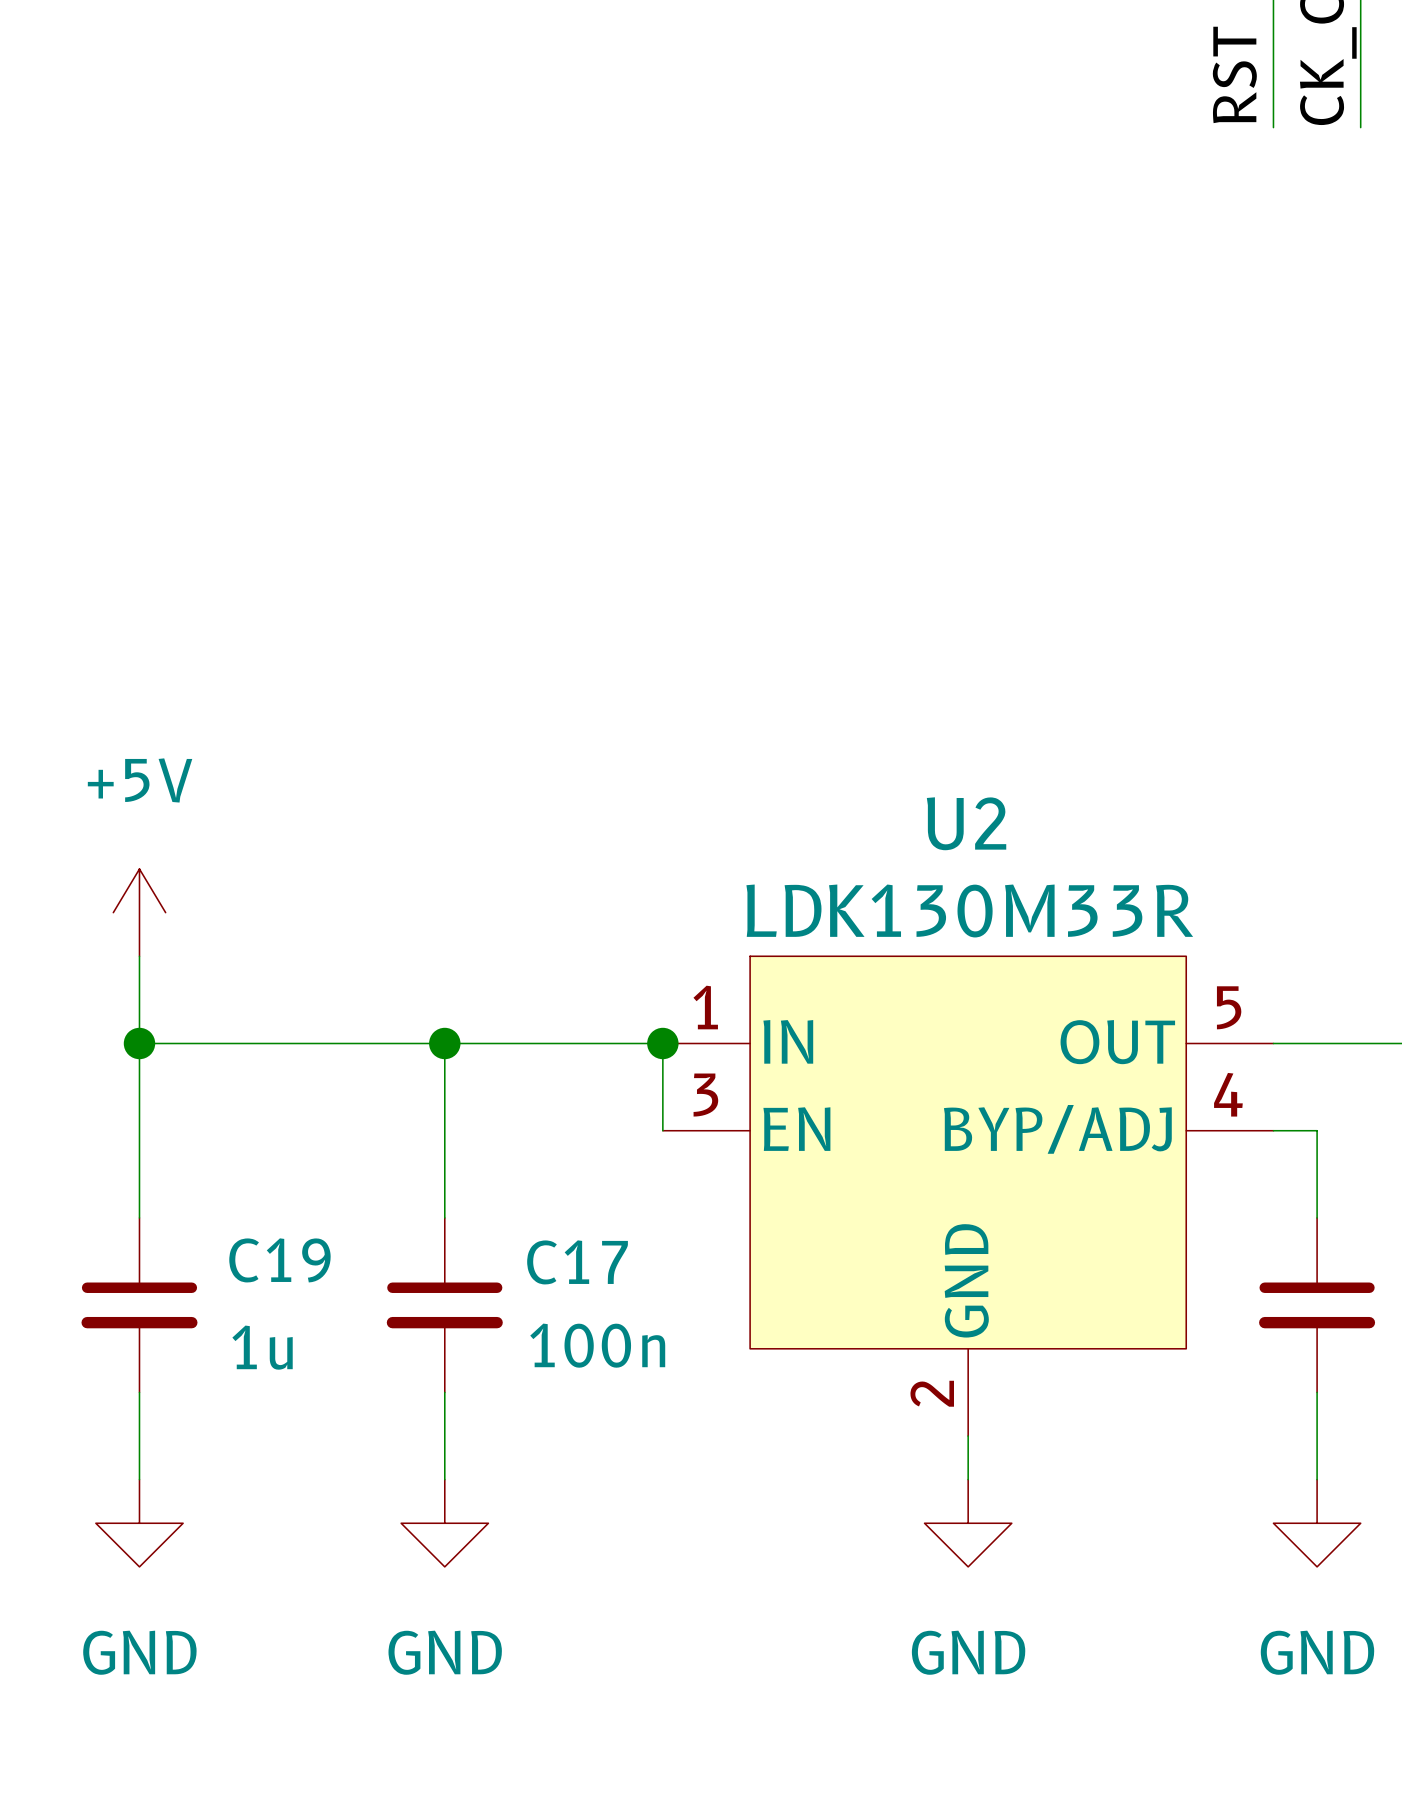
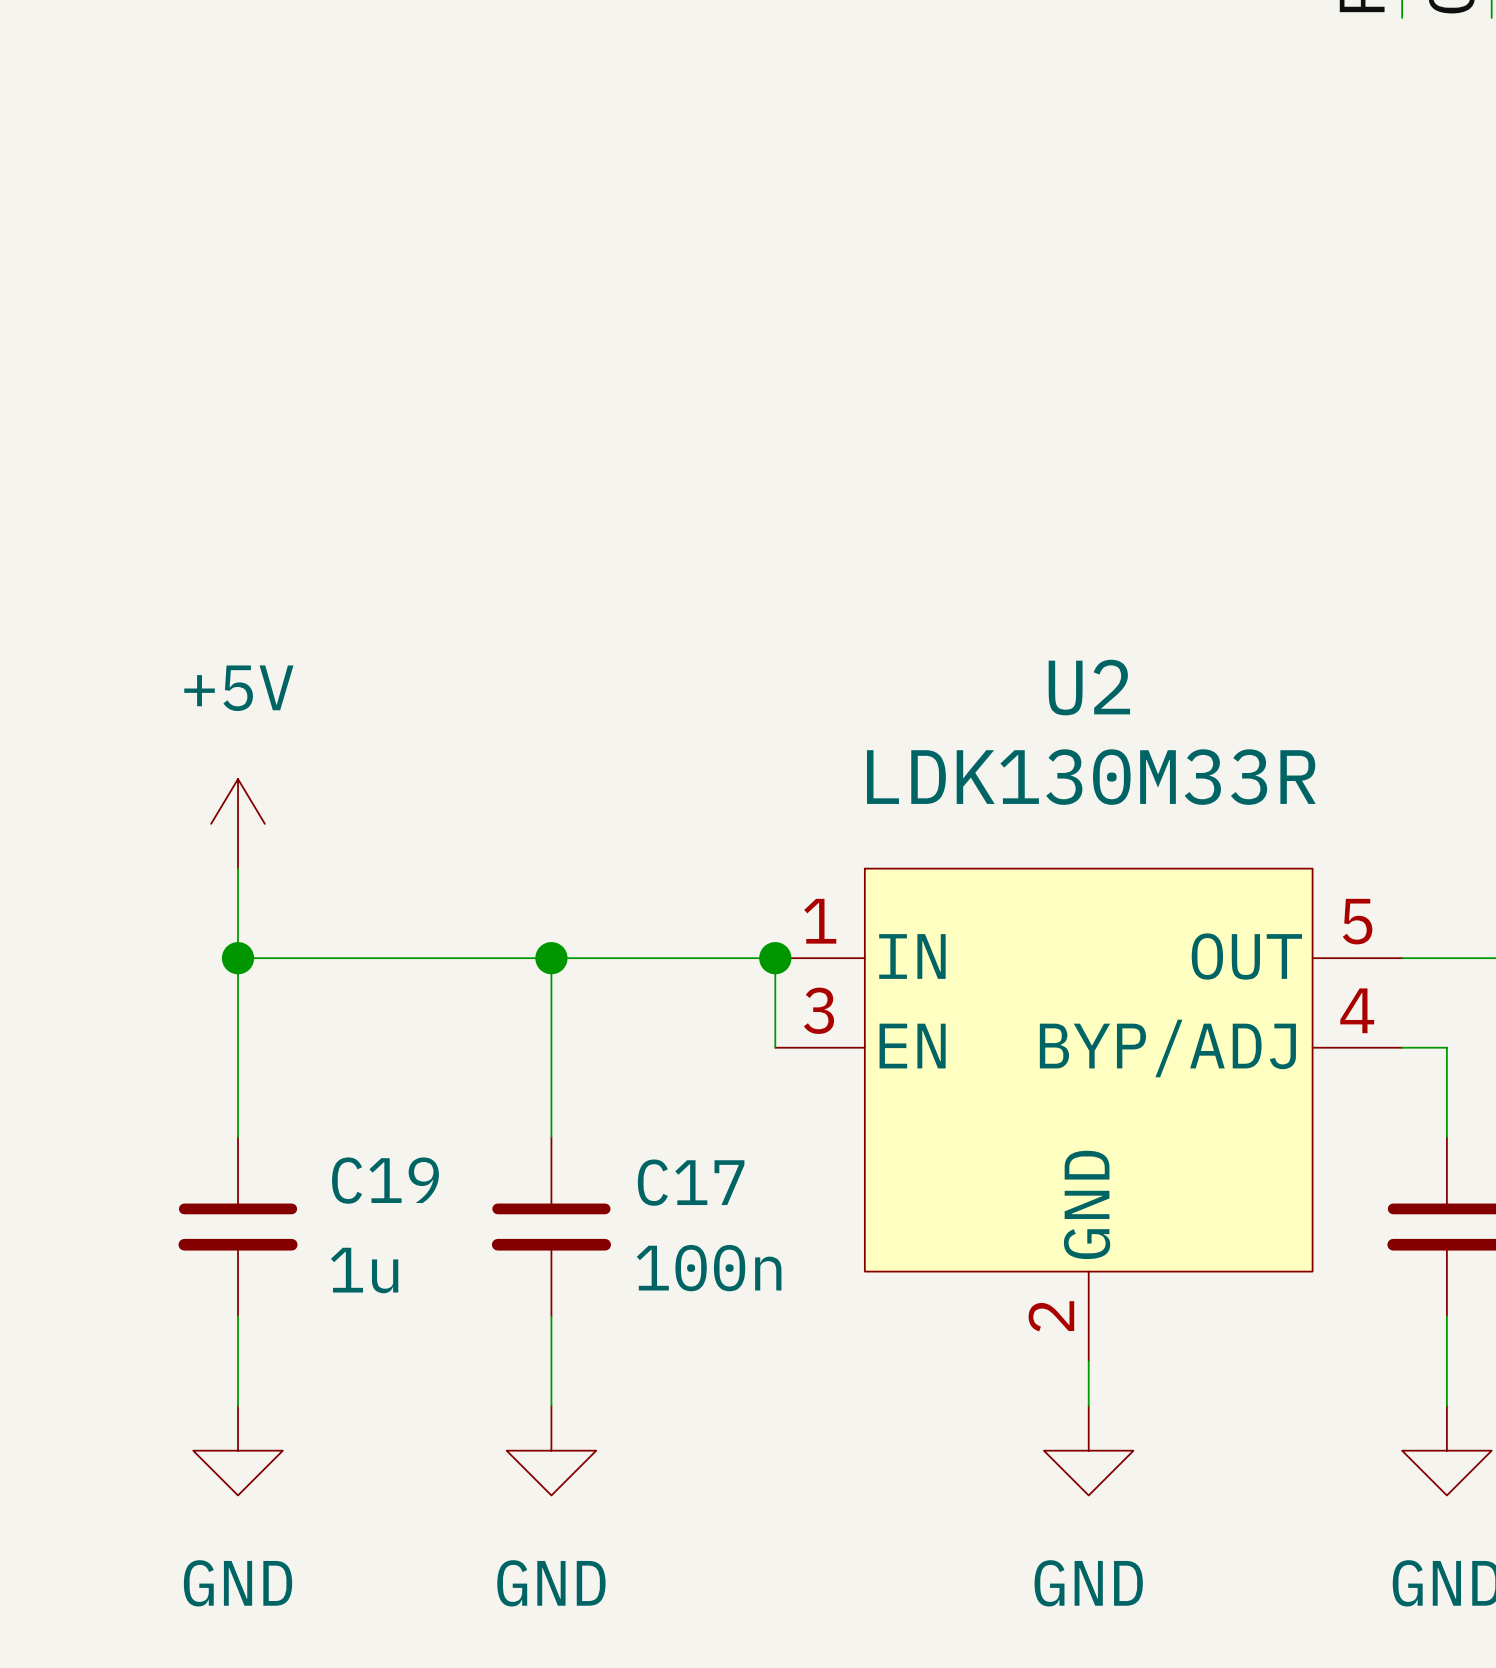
U2 name position: U2 (966, 823) -> U2 (1089, 687)
U2 value position: LDK130M33R (969, 910) -> LDK130M33R (1091, 777)

